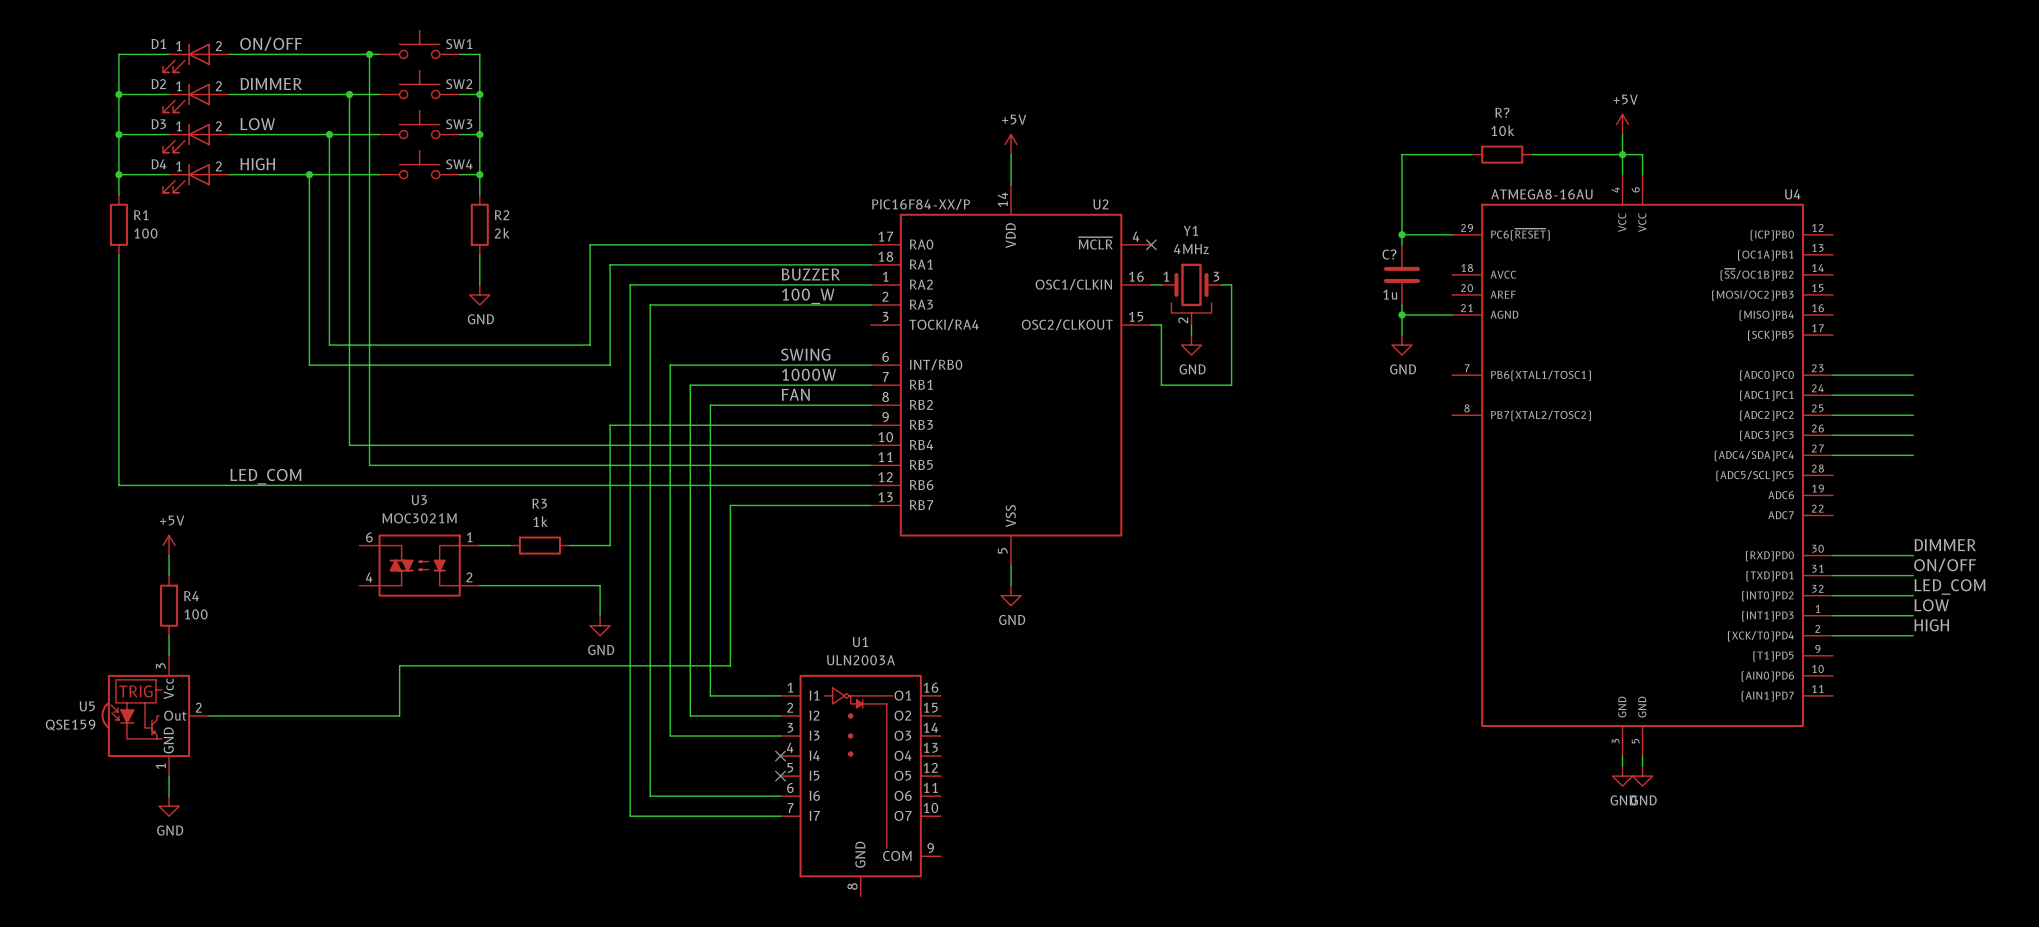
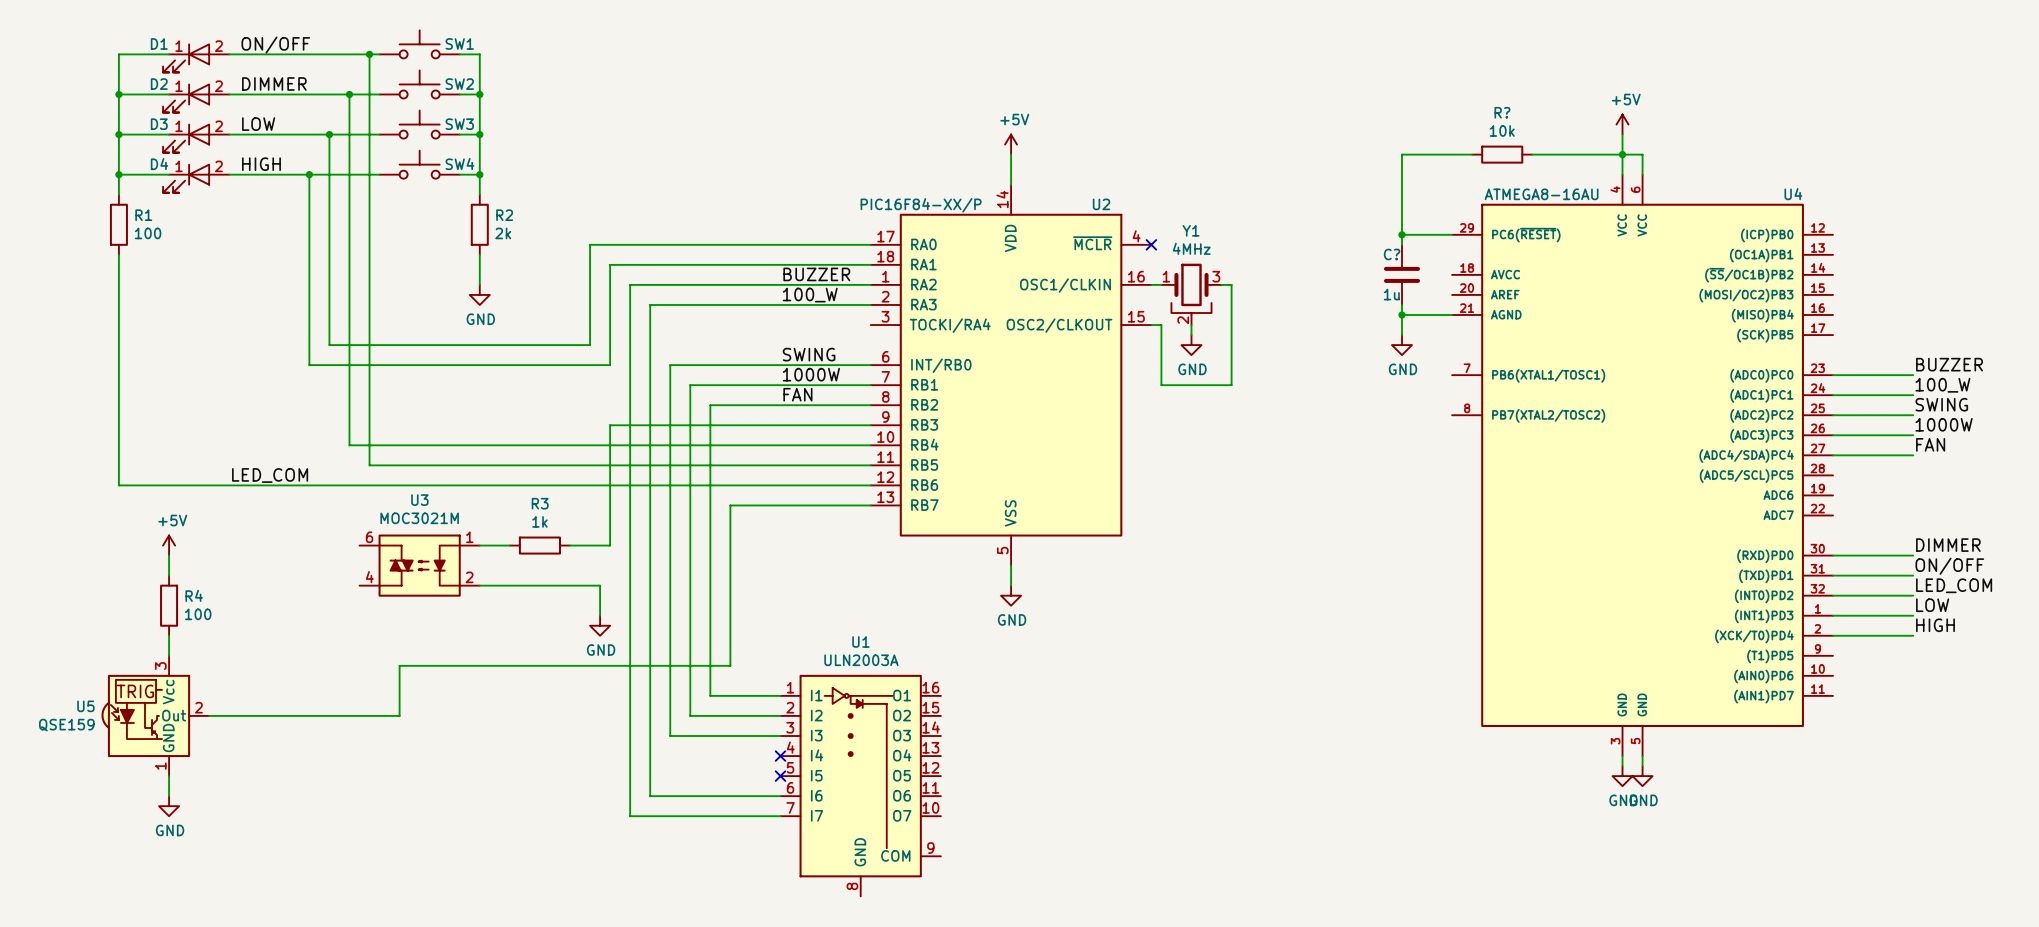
label: none -> BUZZER (1949, 364)
label: none -> 100_W (1942, 385)
label: none -> SWING (1941, 404)
label: none -> 1000W (1944, 424)
label: none -> FAN (1930, 444)

